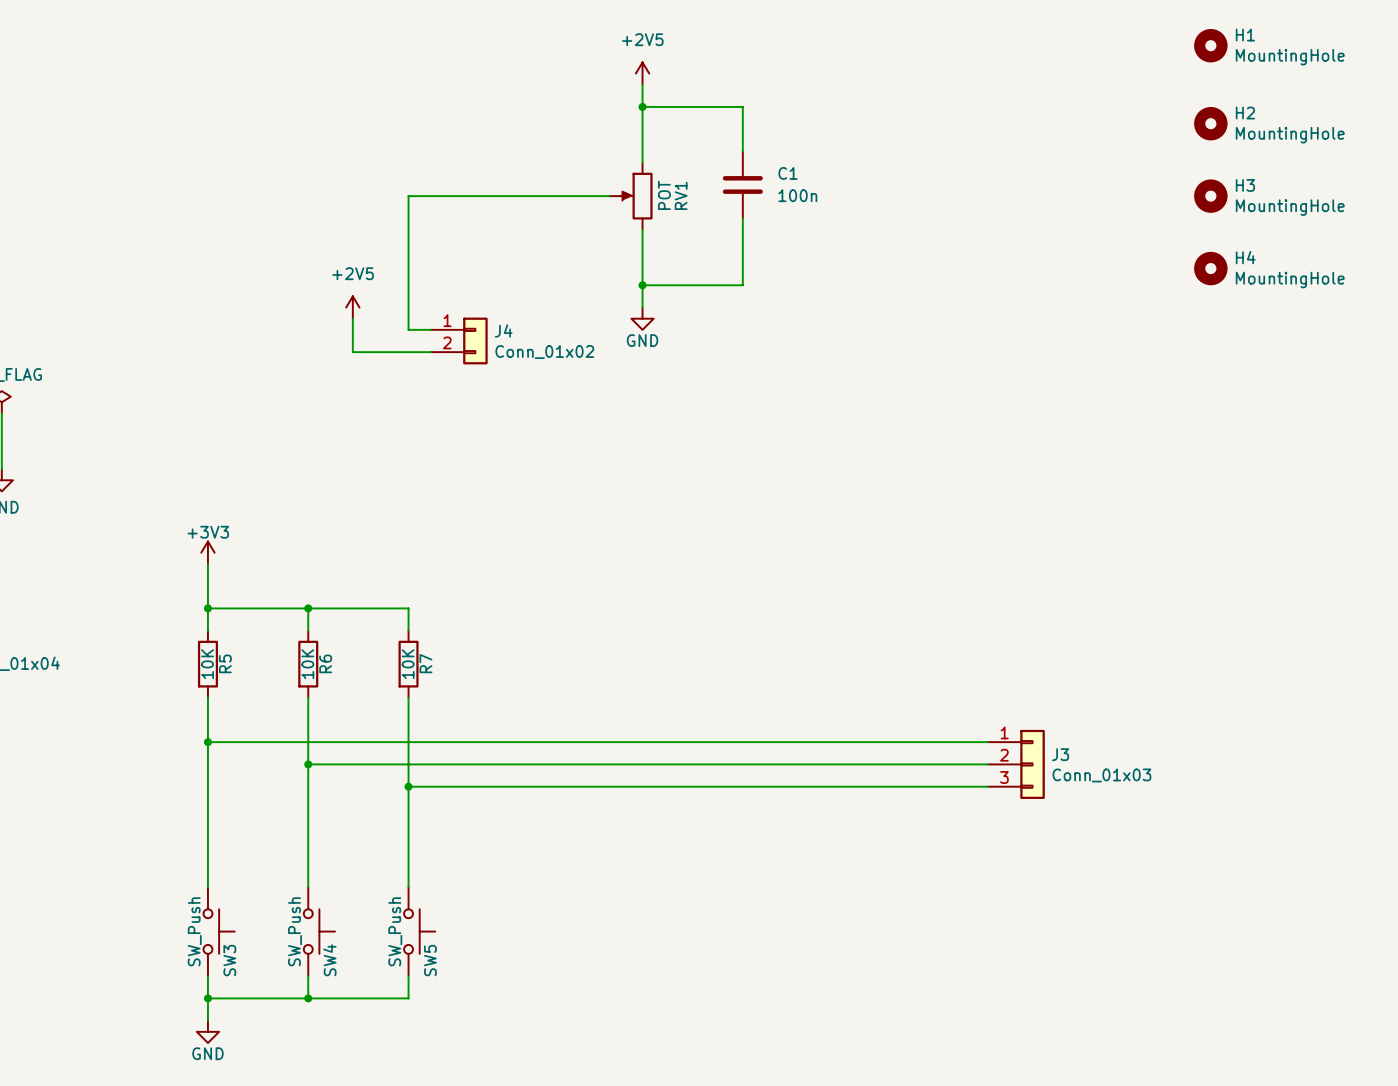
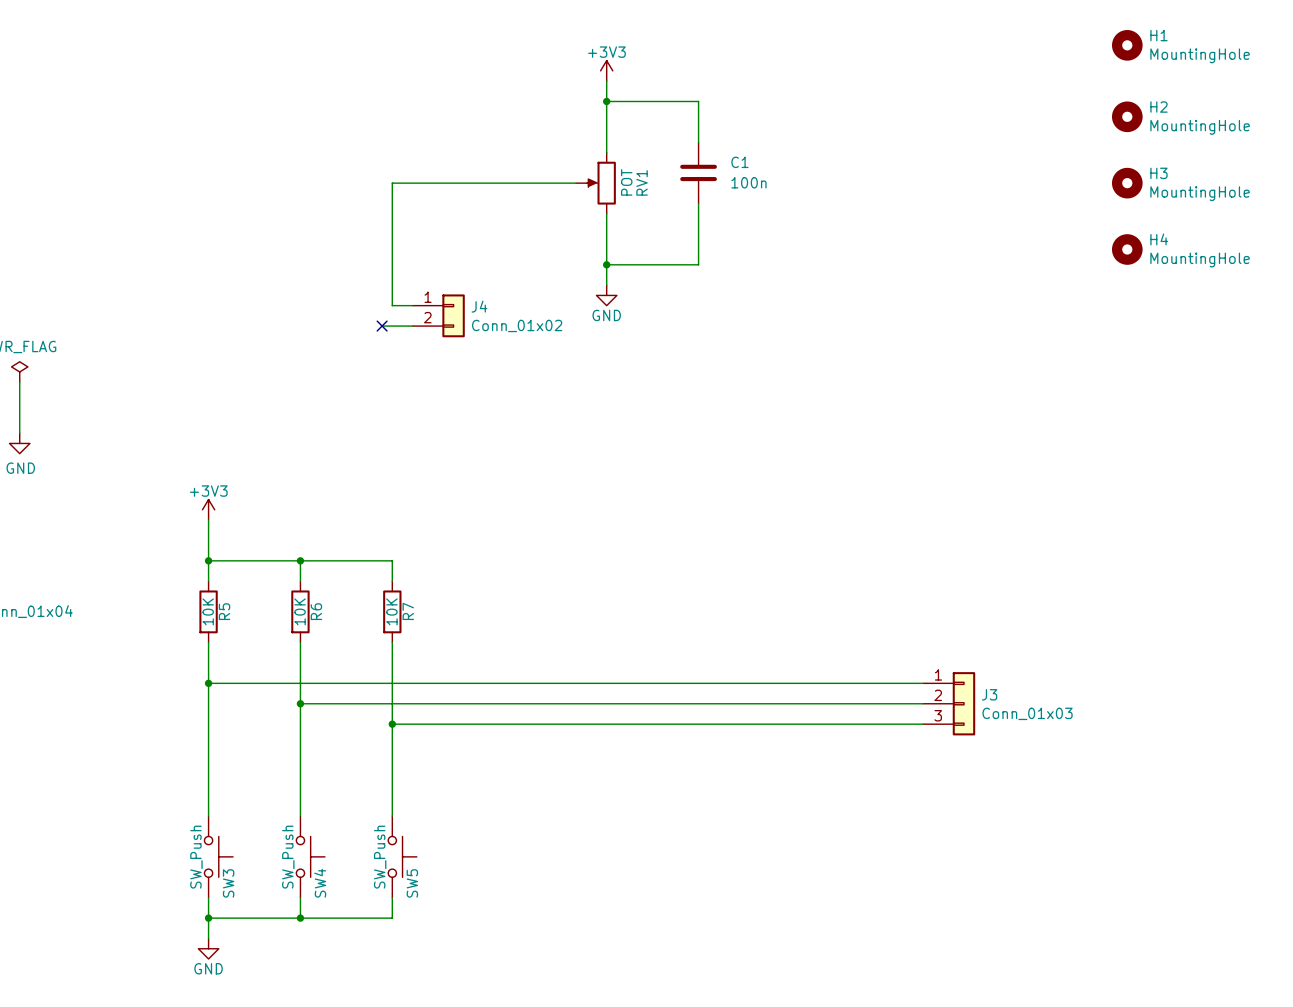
power symbol: +2V5 (642, 73) -> +3V3 (606, 70)
power symbol: +2V5 (352, 307) -> none
wire: (352, 318) (352, 352) (397, 352) -> none
no-connect mark: none -> (382, 326)

